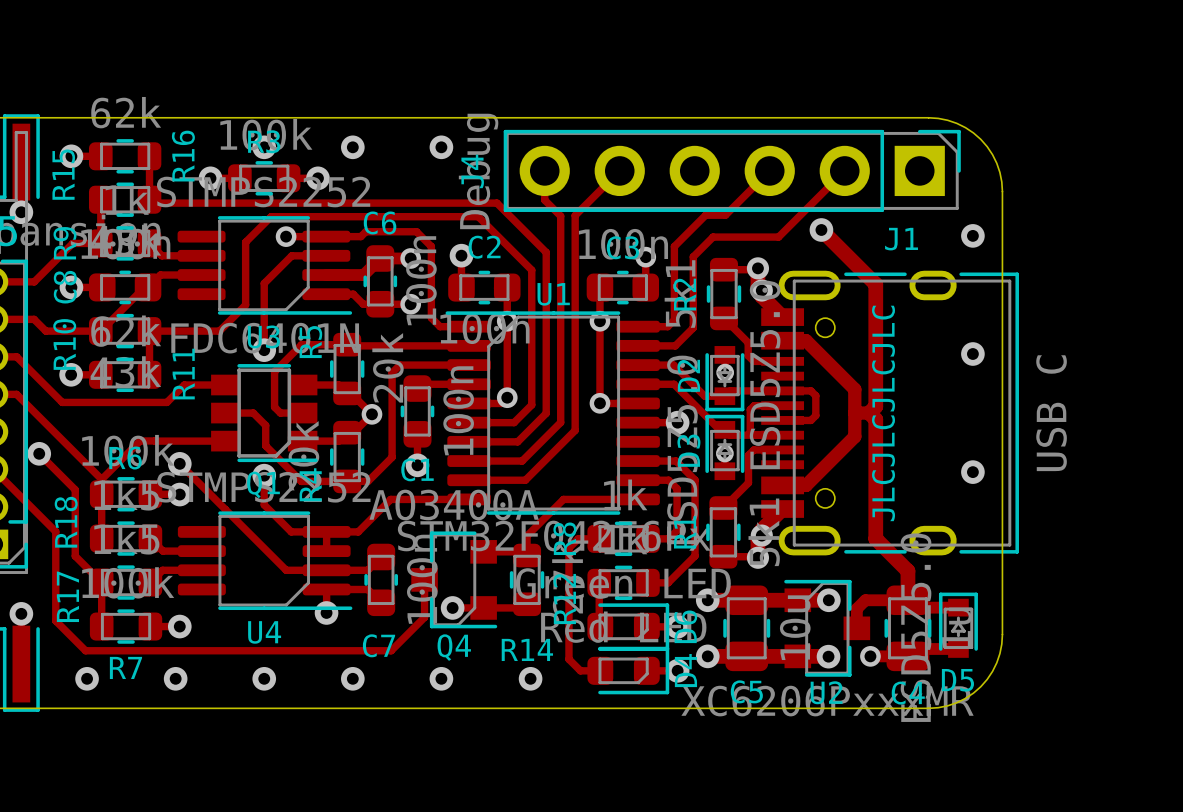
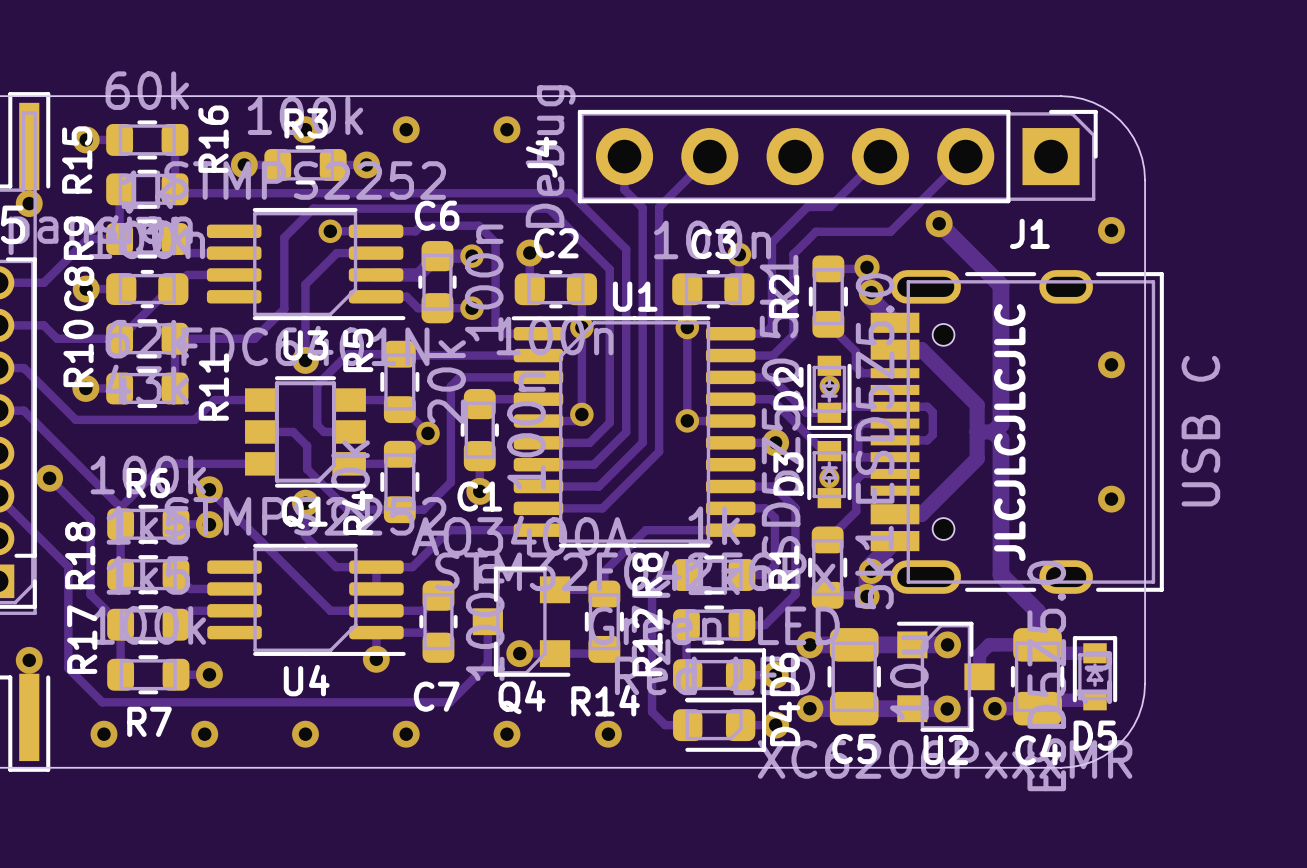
R16 value: 62k (126, 112) -> 60k (147, 90)

